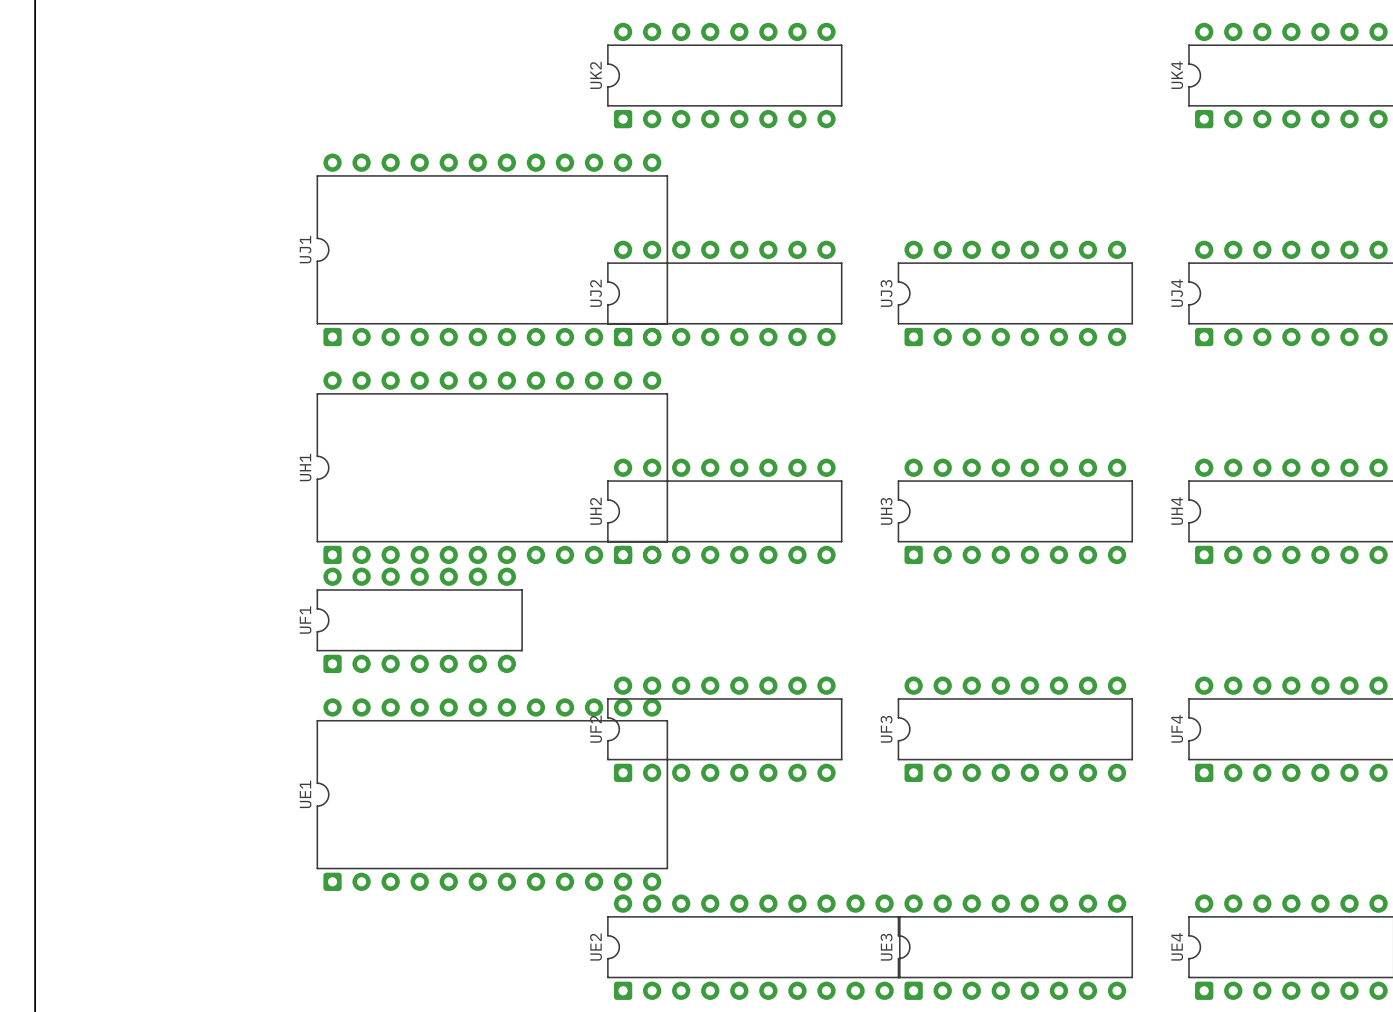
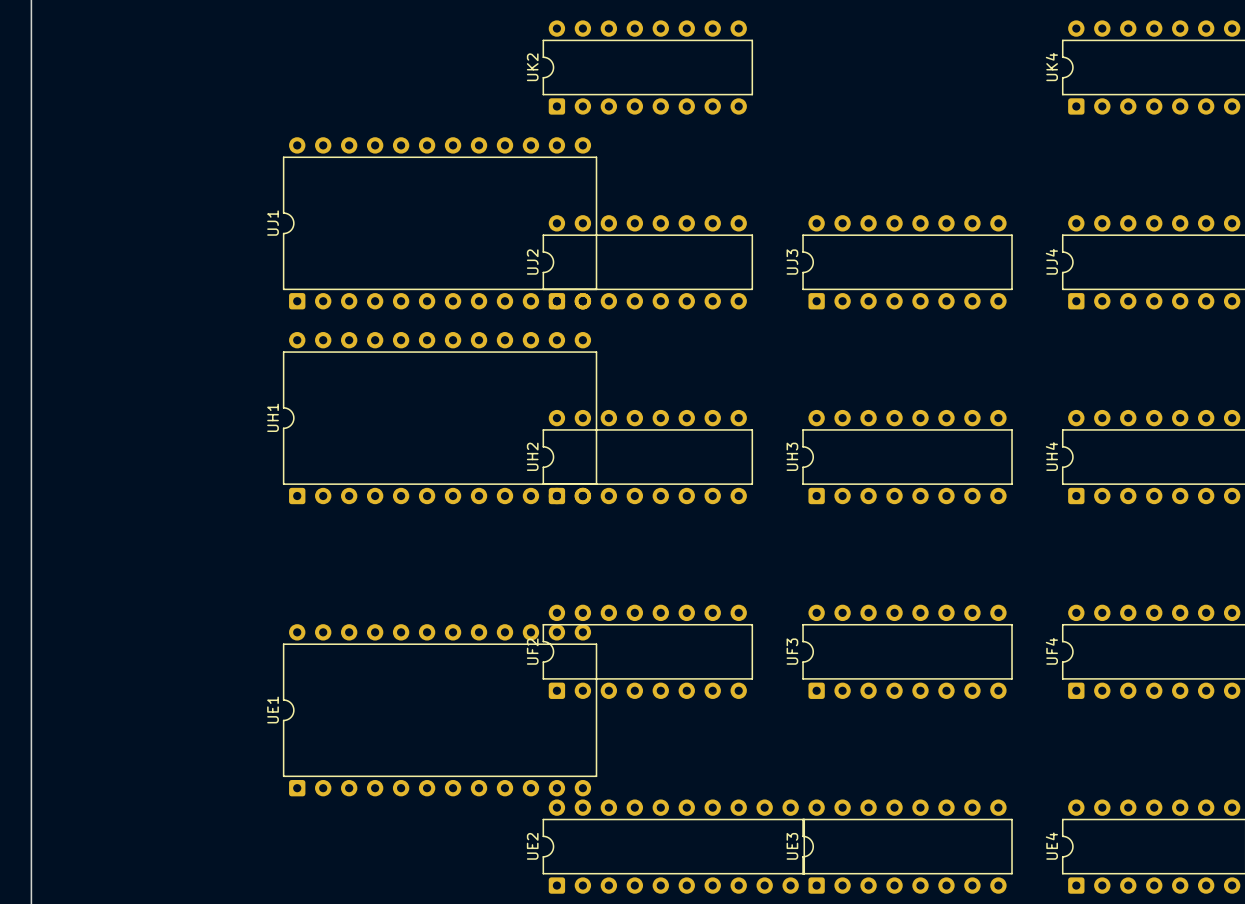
UF1: (419, 620) -> none

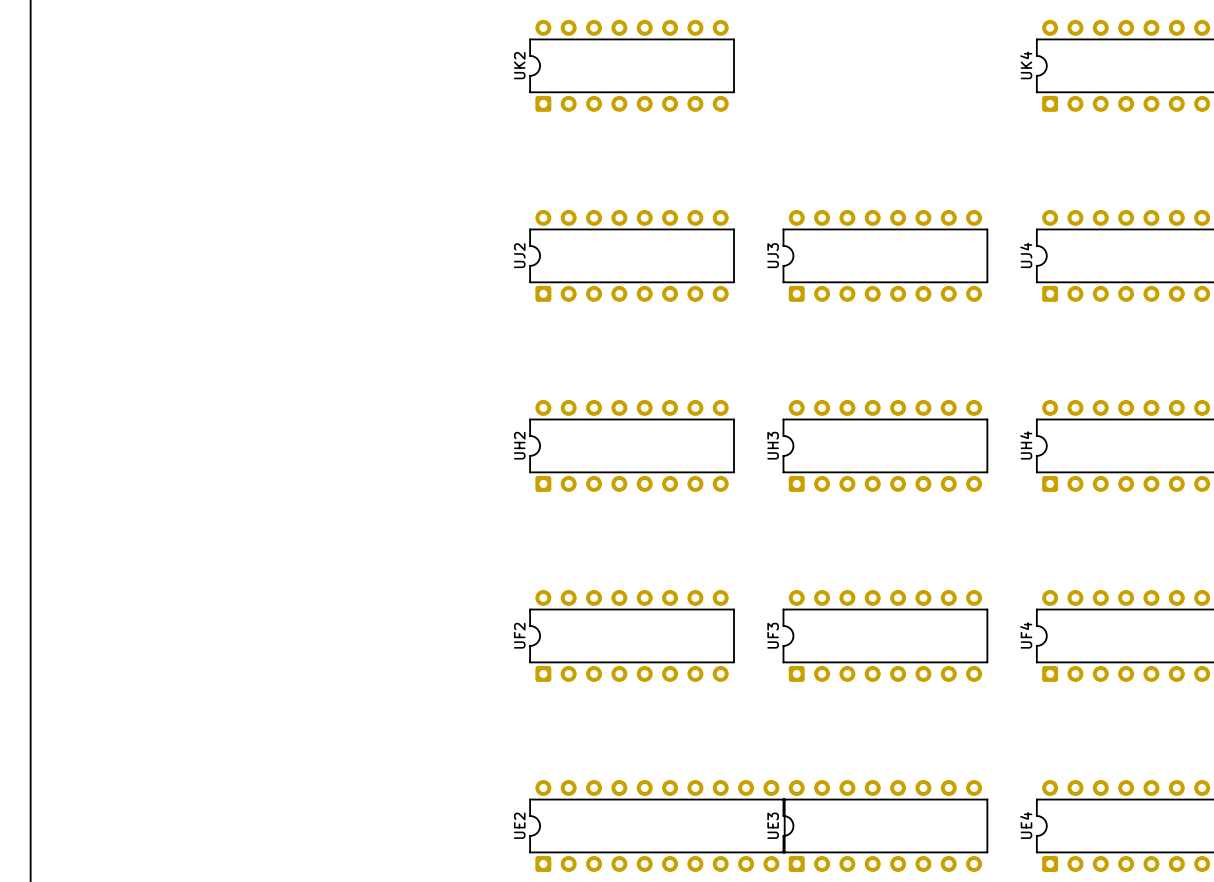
UJ1: (440, 223) -> none
UH1: (440, 418) -> none
UE1: (440, 710) -> none

